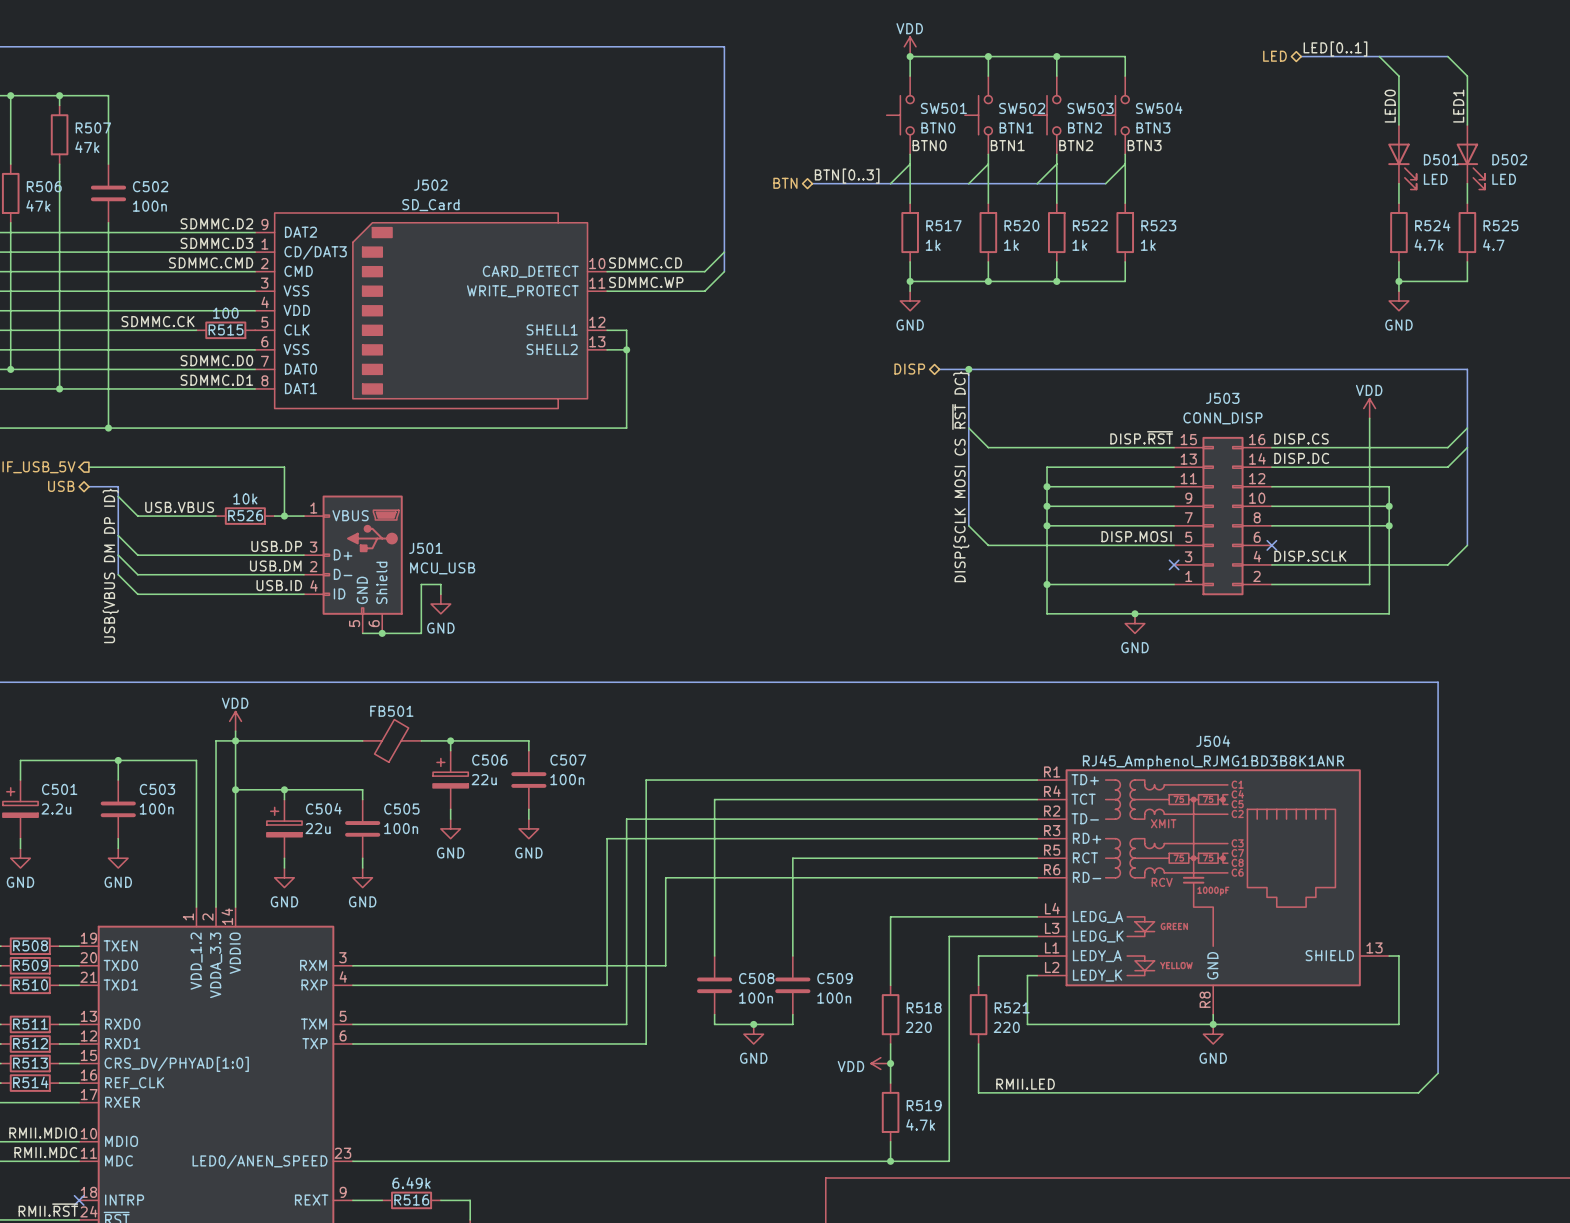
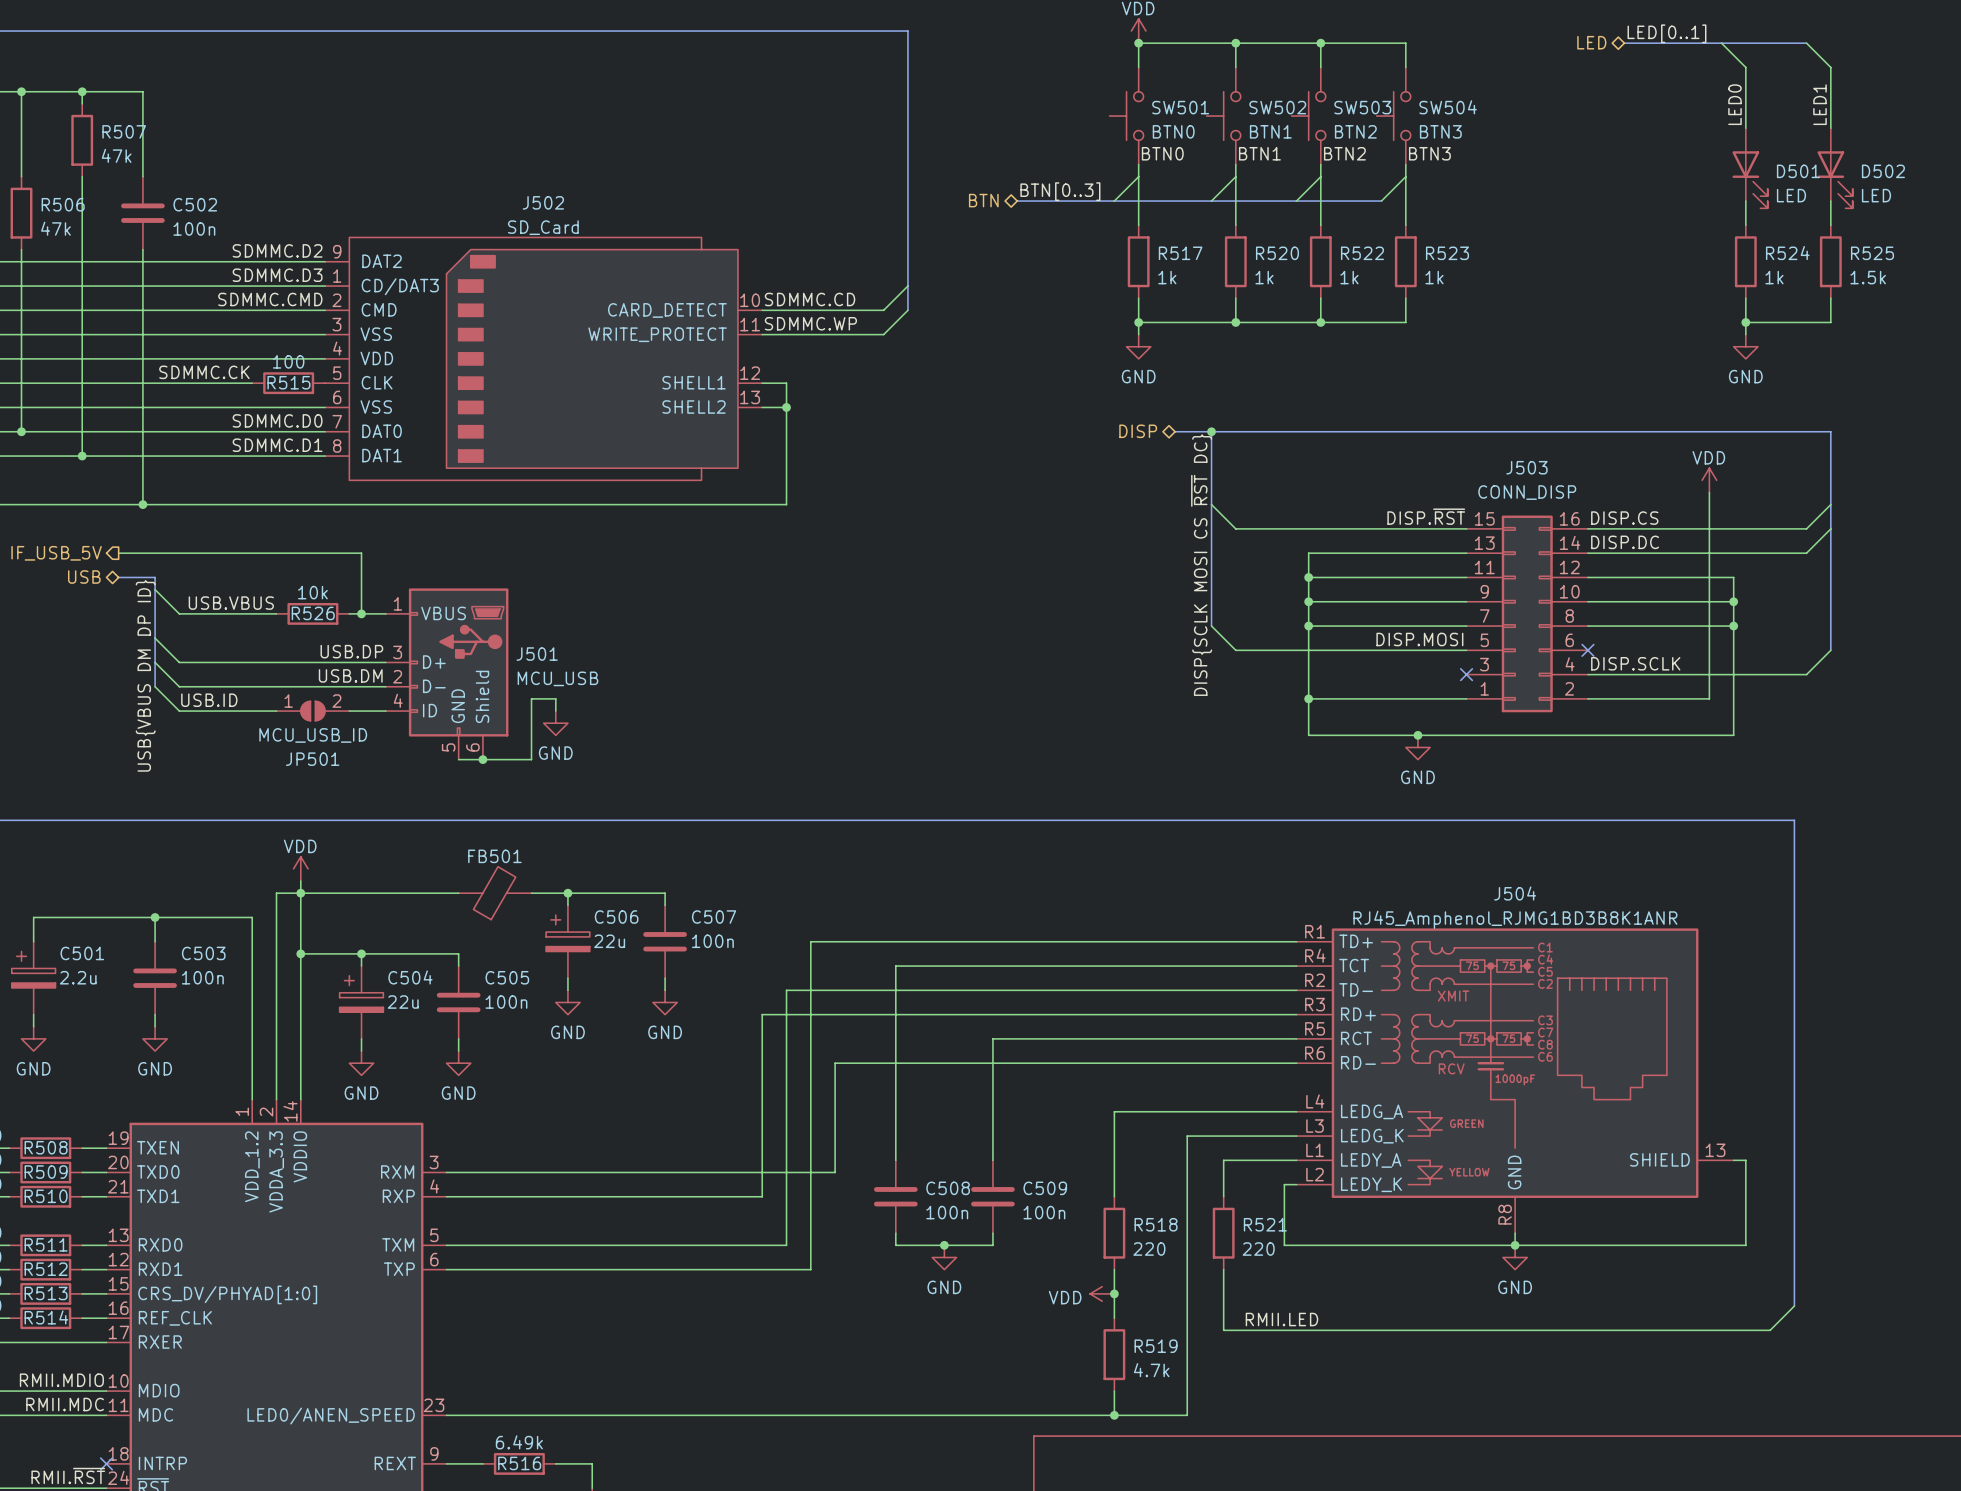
R524 value: 4.7k (1429, 245) -> 1k (1774, 277)
R525 value: 4.7 (1493, 245) -> 1.5k (1868, 277)
label position: USB.ID (279, 585) -> USB.ID (209, 700)
JP501: none -> MCU_USB_ID (312, 711)

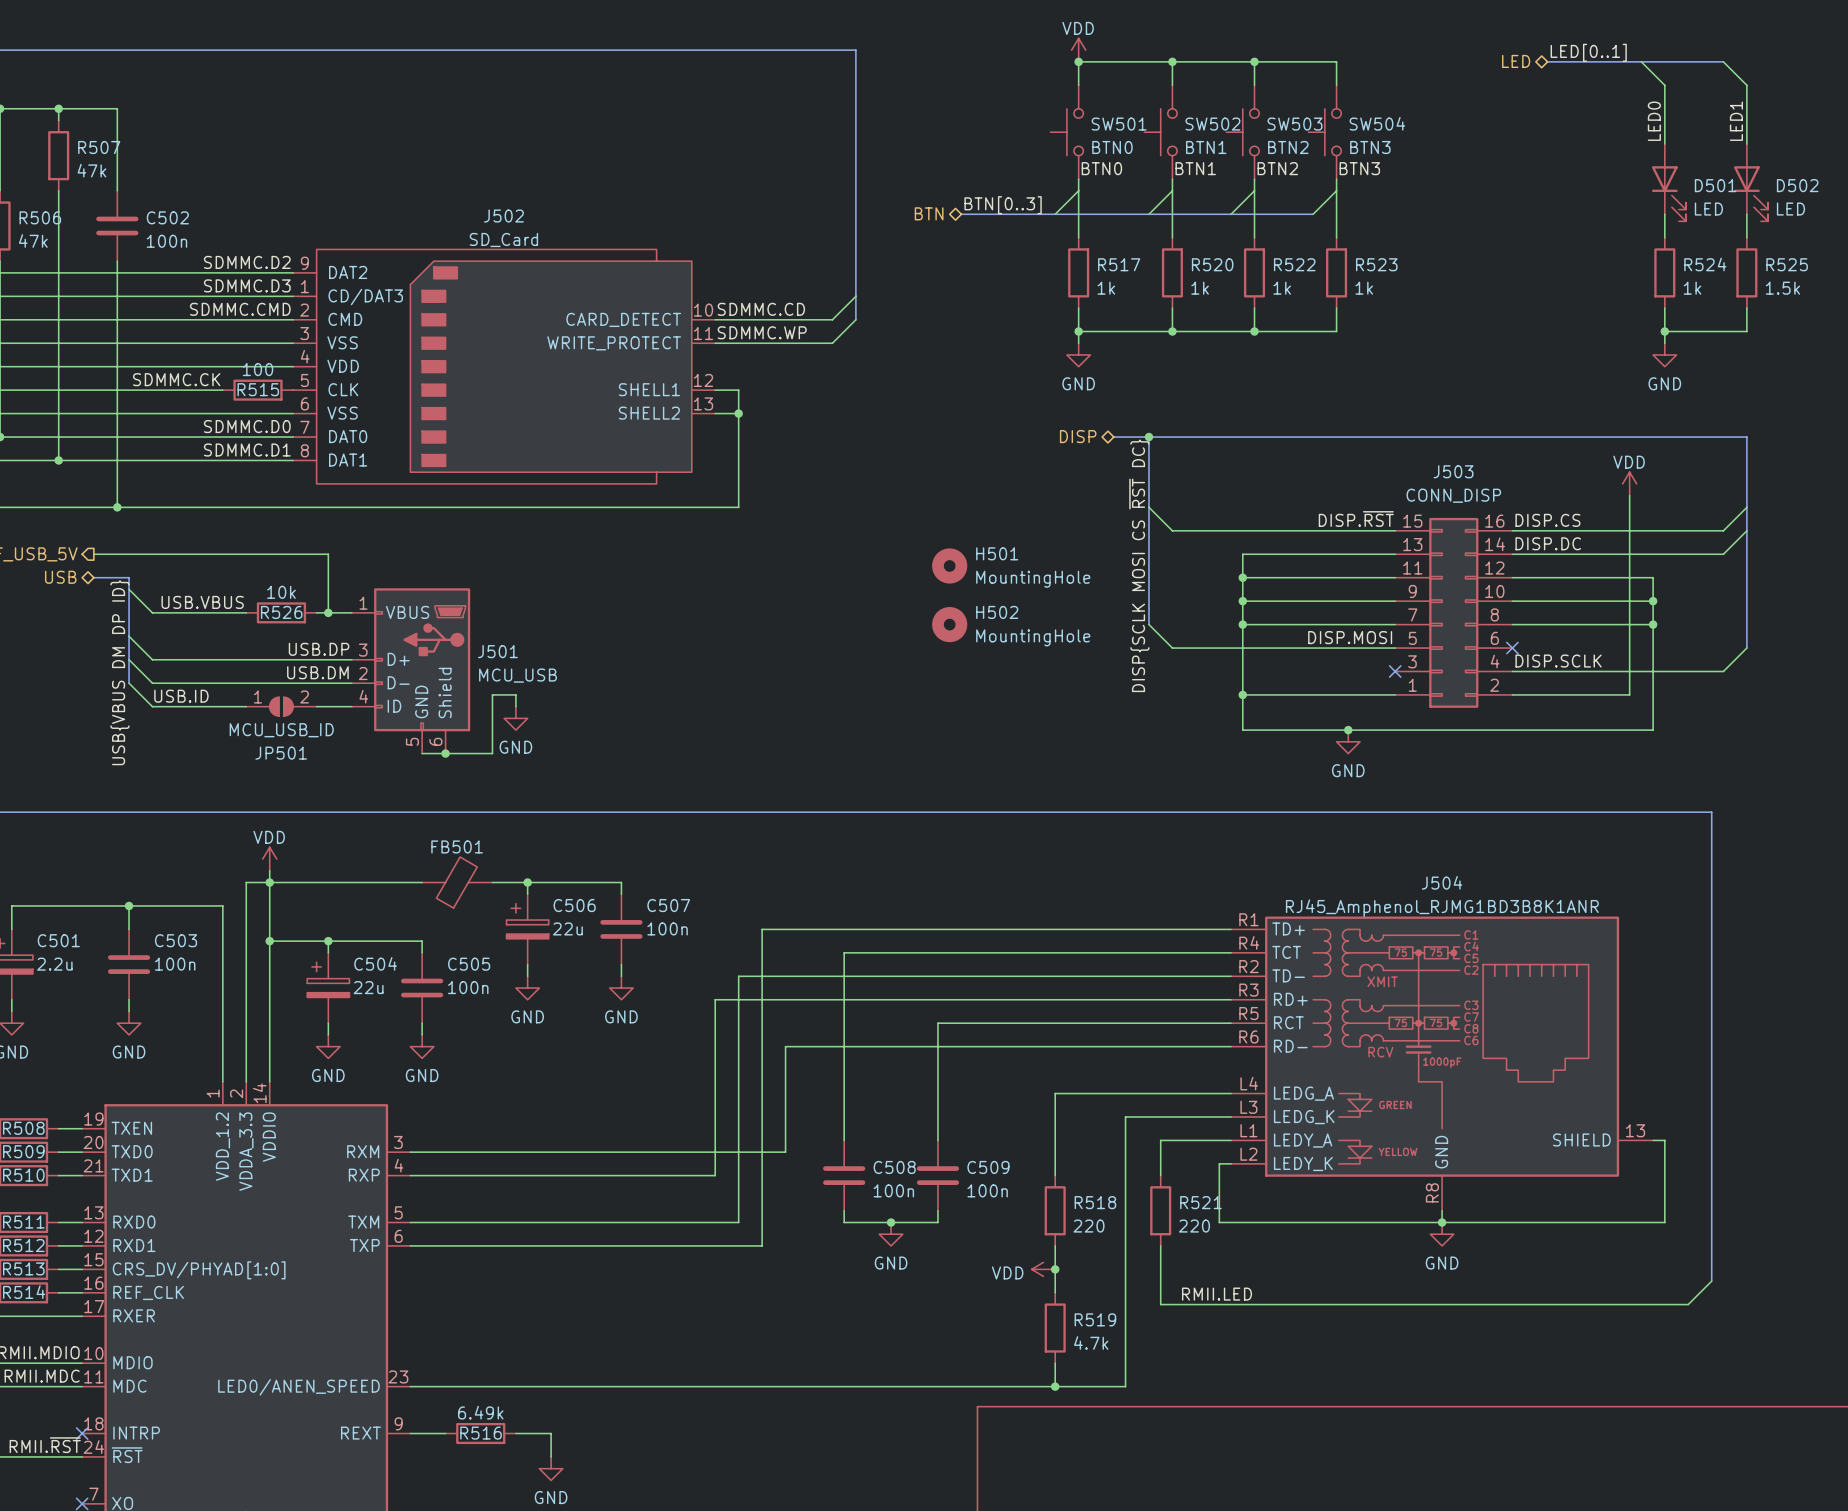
H501: none -> MountingHole (949, 565)
H502: none -> MountingHole (949, 624)

